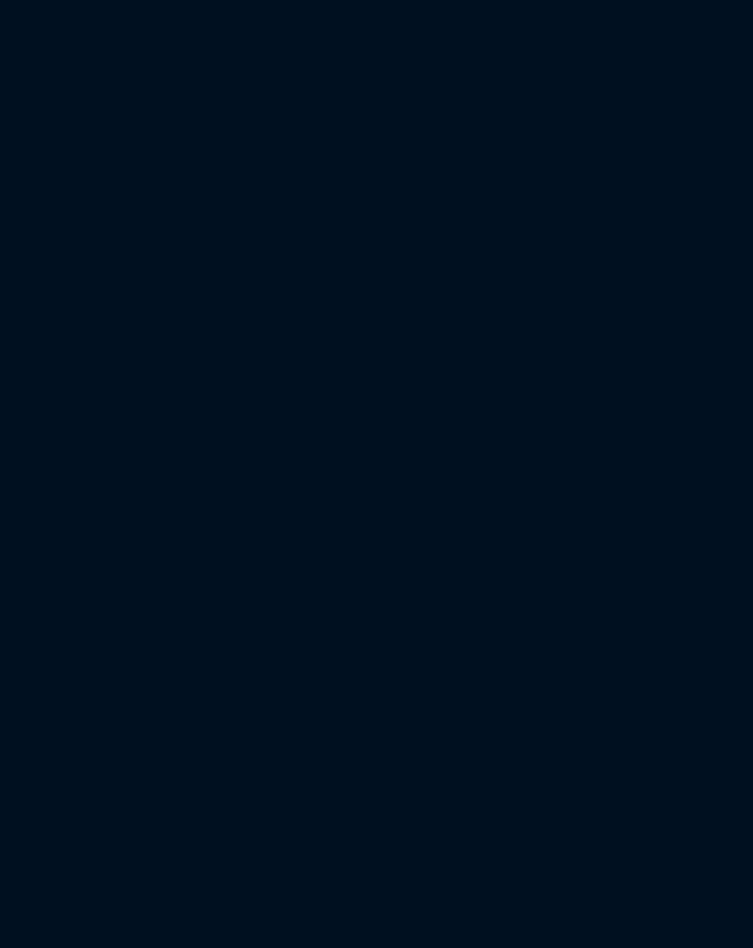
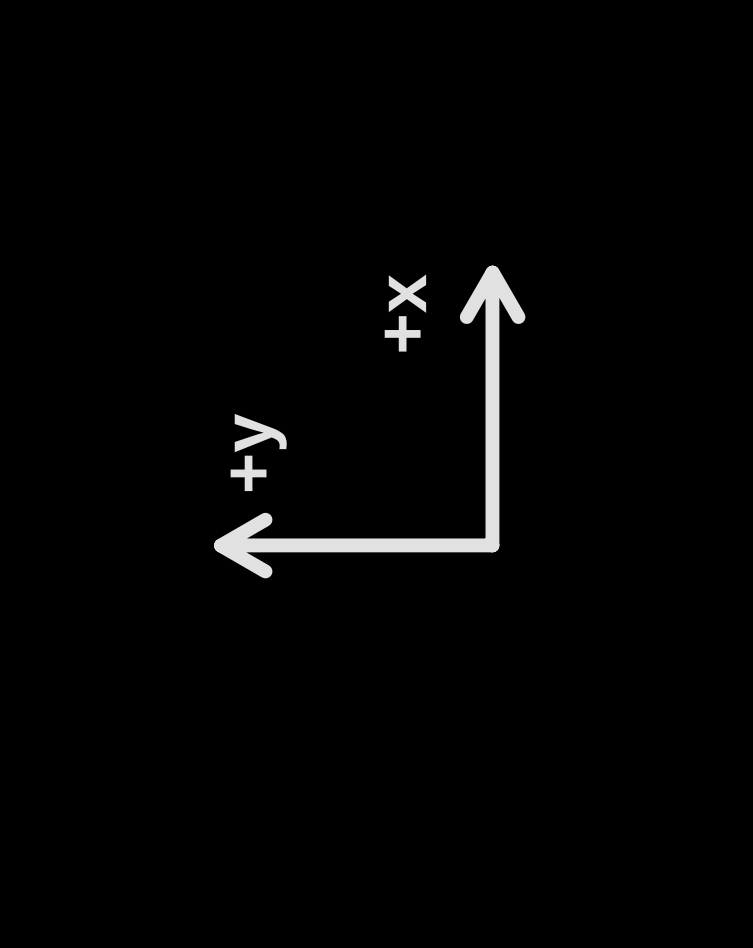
line: none -> (492, 272) (518, 317)
text: none -> +x (405, 313)
line: none -> (466, 317) (492, 272) (492, 545) (222, 545)
text: none -> +y (258, 452)
line: none -> (265, 519) (221, 545) (265, 571)

